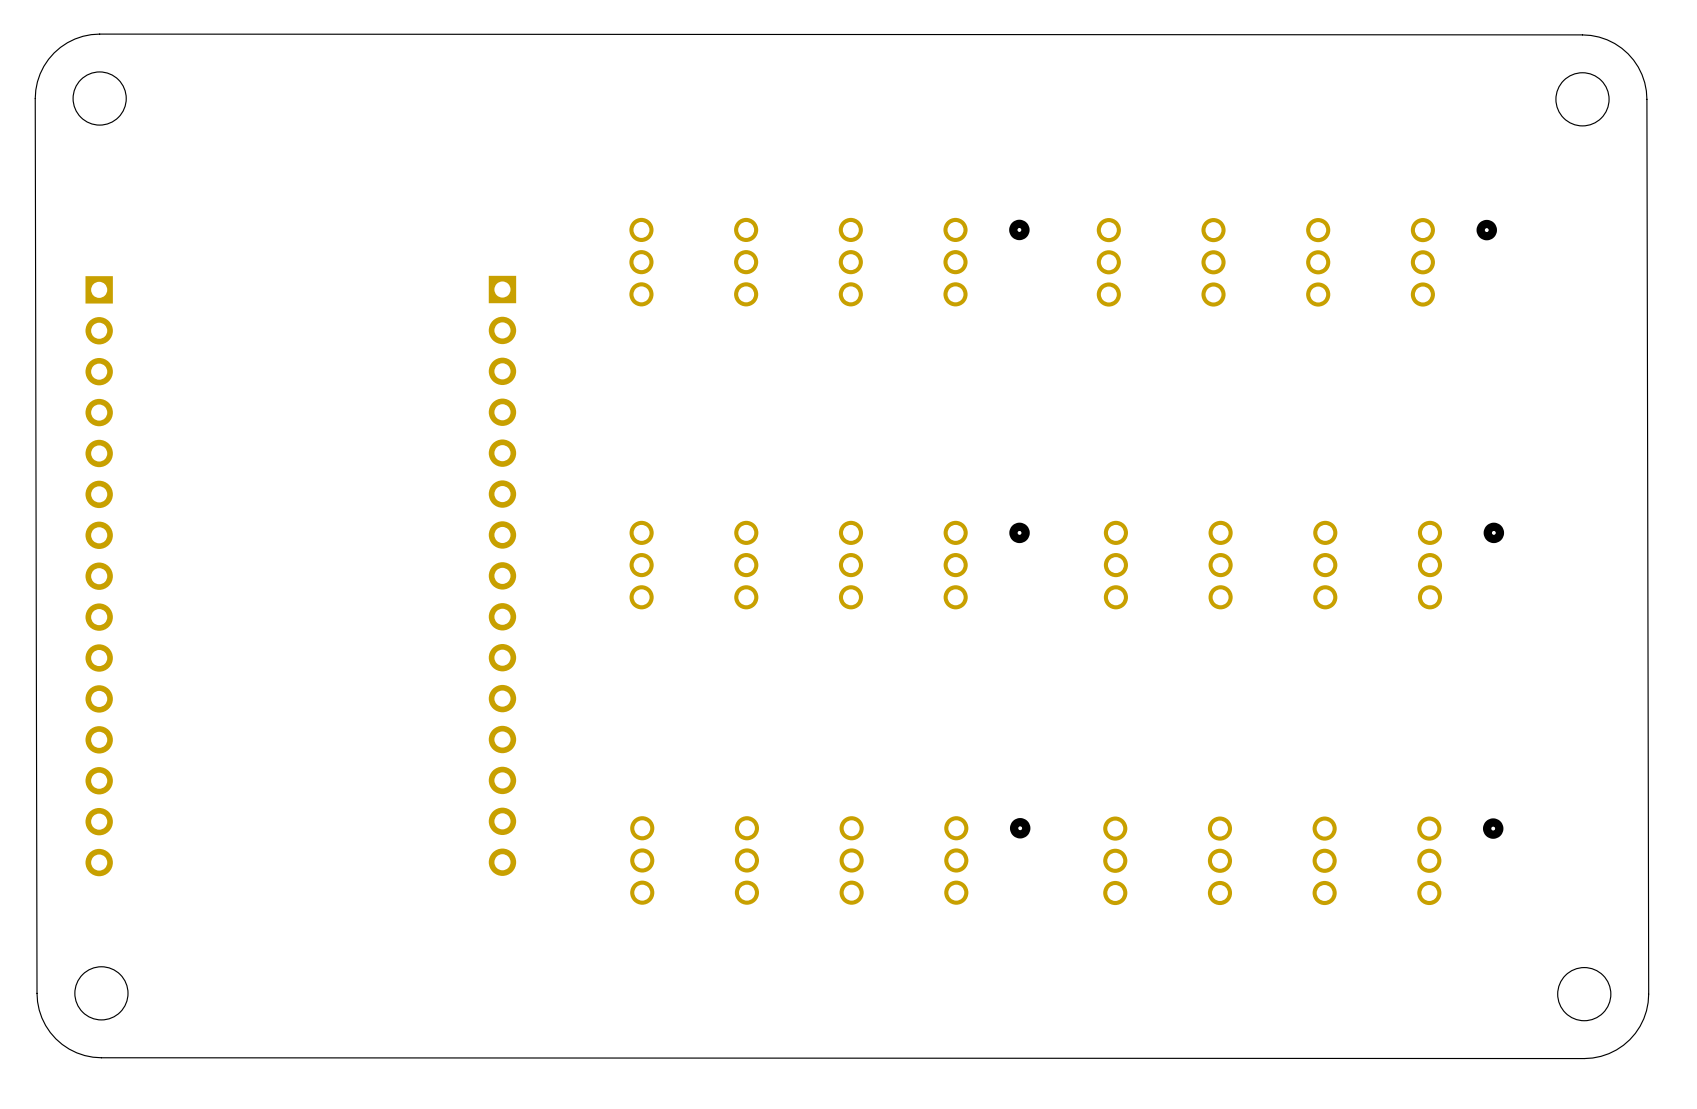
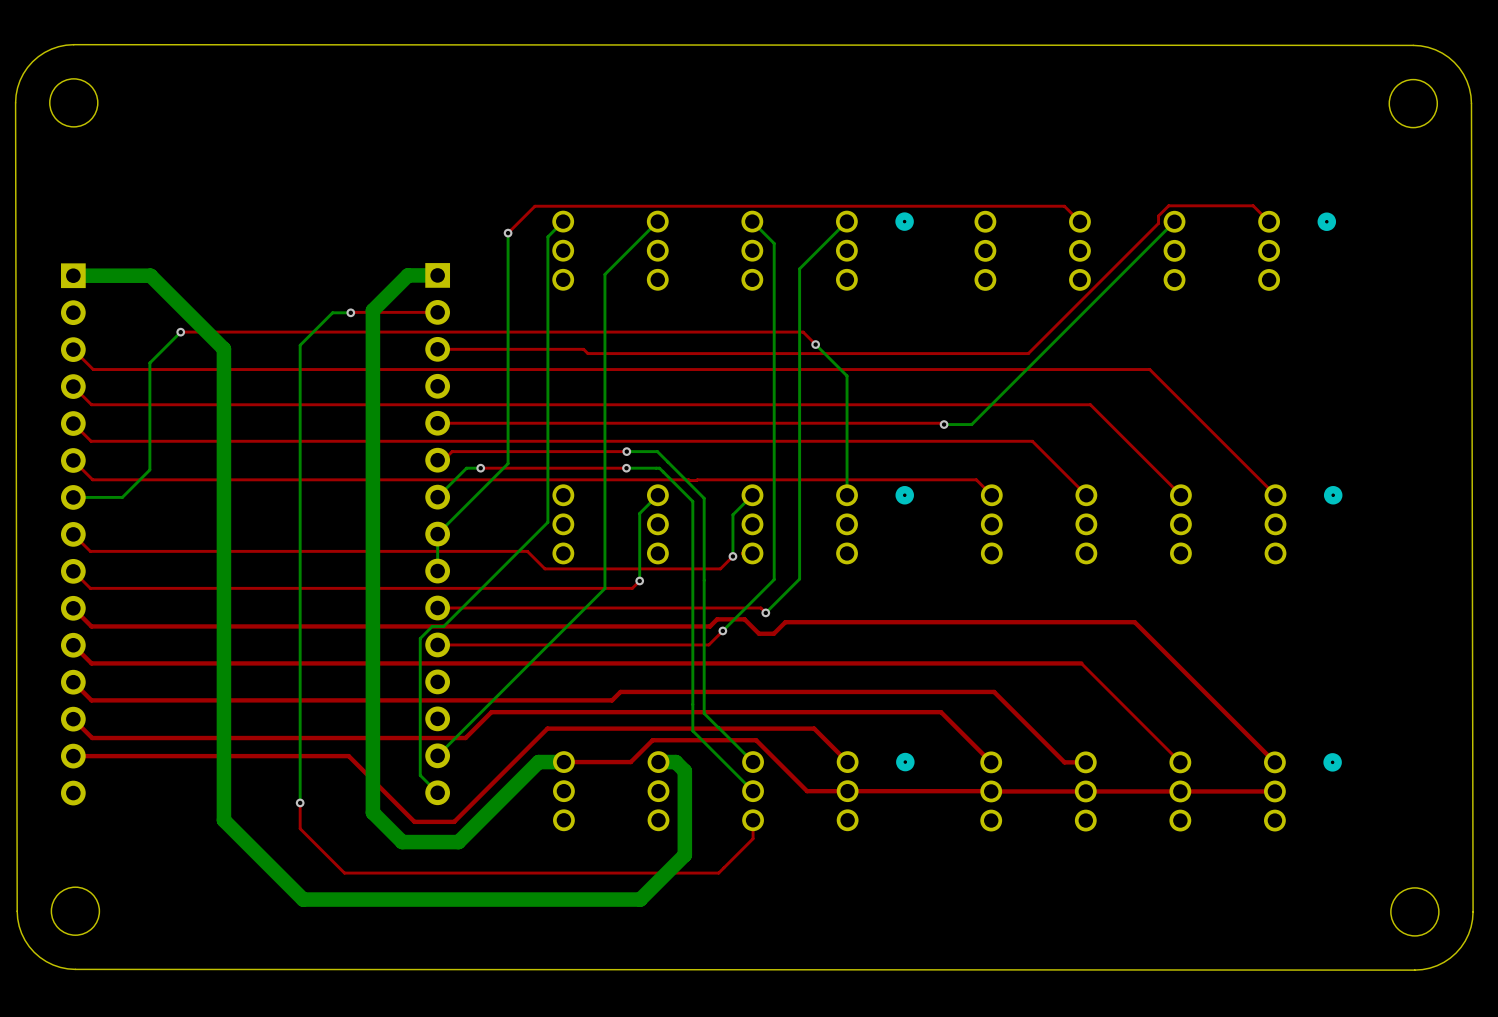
bottom track: none -> (563, 221) (547, 236) (547, 522) (443, 626) (432, 626) (420, 638) (420, 775) (437, 792)
bottom track: none -> (657, 221) (604, 274) (604, 588) (437, 755)
bottom track: none -> (752, 221) (774, 243) (774, 579) (722, 630)
bottom track: none -> (846, 221) (799, 268) (799, 579) (765, 612)
top track: none -> (1079, 221) (1064, 206) (534, 206) (508, 233)
bottom track: none -> (1174, 221) (971, 424) (944, 424)
top track: none -> (1269, 221) (1253, 205) (1168, 205) (1158, 215) (1158, 223) (1028, 353) (587, 353) (583, 349) (437, 349)
bottom track: none -> (508, 233) (508, 463) (437, 534) (437, 571)
via: none -> (508, 233)
bottom track: none -> (73, 275) (150, 275) (223, 349) (223, 820) (303, 899) (640, 899) (684, 855) (684, 771) (675, 762) (658, 762)
bottom track: none -> (437, 275) (407, 275) (372, 310) (372, 812) (402, 842) (458, 842) (538, 762) (563, 762)
bottom track: none -> (350, 312) (332, 312) (300, 345) (300, 802)
via: none -> (350, 312)
top track: none -> (437, 312) (350, 312)
top track: none -> (180, 332) (803, 332) (815, 344)
bottom track: none -> (180, 332) (149, 363) (149, 469) (122, 497) (73, 497)
via: none -> (180, 332)
bottom track: none -> (815, 344) (847, 375) (847, 495)
via: none -> (815, 344)
top track: none -> (73, 349) (93, 369) (1149, 369) (1275, 495)
top track: none -> (73, 386) (91, 404) (1090, 404) (1180, 495)
top track: none -> (73, 423) (91, 441) (1032, 441) (1086, 495)
top track: none -> (437, 423) (944, 424)
via: none -> (944, 424)
top track: none -> (626, 451) (452, 451) (443, 460) (437, 460)
bottom track: none -> (626, 451) (657, 451) (704, 498) (704, 713) (718, 727)
via: none -> (626, 451)
top track: none -> (73, 460) (92, 479) (976, 479) (991, 495)
bottom track: none -> (480, 468) (466, 468) (437, 497)
via: none -> (480, 468)
top track: none -> (626, 468) (480, 468)
bottom track: none -> (626, 468) (659, 468) (692, 501) (692, 730) (753, 791)
via: none -> (626, 468)
bottom track: none -> (657, 495) (639, 513) (639, 580)
bottom track: none -> (752, 495) (732, 514) (732, 556)
top track: none -> (73, 534) (90, 551) (527, 551) (544, 568) (720, 568) (732, 556)
via: none -> (732, 556)
top track: none -> (73, 571) (90, 588) (632, 588) (639, 580)
via: none -> (639, 580)
top track: none -> (437, 608) (760, 608) (765, 612)
top track: none -> (73, 608) (91, 626) (710, 626) (717, 619) (744, 619) (759, 633) (773, 633) (785, 622) (1134, 622) (1274, 762)
via: none -> (765, 612)
top track: none -> (722, 630) (708, 644) (437, 644)
via: none -> (722, 630)
top track: none -> (73, 645) (91, 663) (1081, 663) (1180, 762)
top track: none -> (73, 682) (91, 700) (612, 700) (620, 691) (994, 691) (1064, 762) (1085, 762)
top track: none -> (73, 719) (92, 738) (465, 738) (491, 712) (941, 712) (991, 762)
bottom track: none -> (718, 727) (753, 762)
top track: none -> (73, 756) (348, 756) (414, 821) (454, 821) (547, 728) (814, 728) (847, 762)
top track: none -> (563, 762) (630, 762) (652, 740) (756, 740) (807, 791) (1274, 791)
top track: none -> (300, 802) (300, 828) (344, 873) (718, 873) (753, 838) (753, 820)
via: none -> (300, 802)

